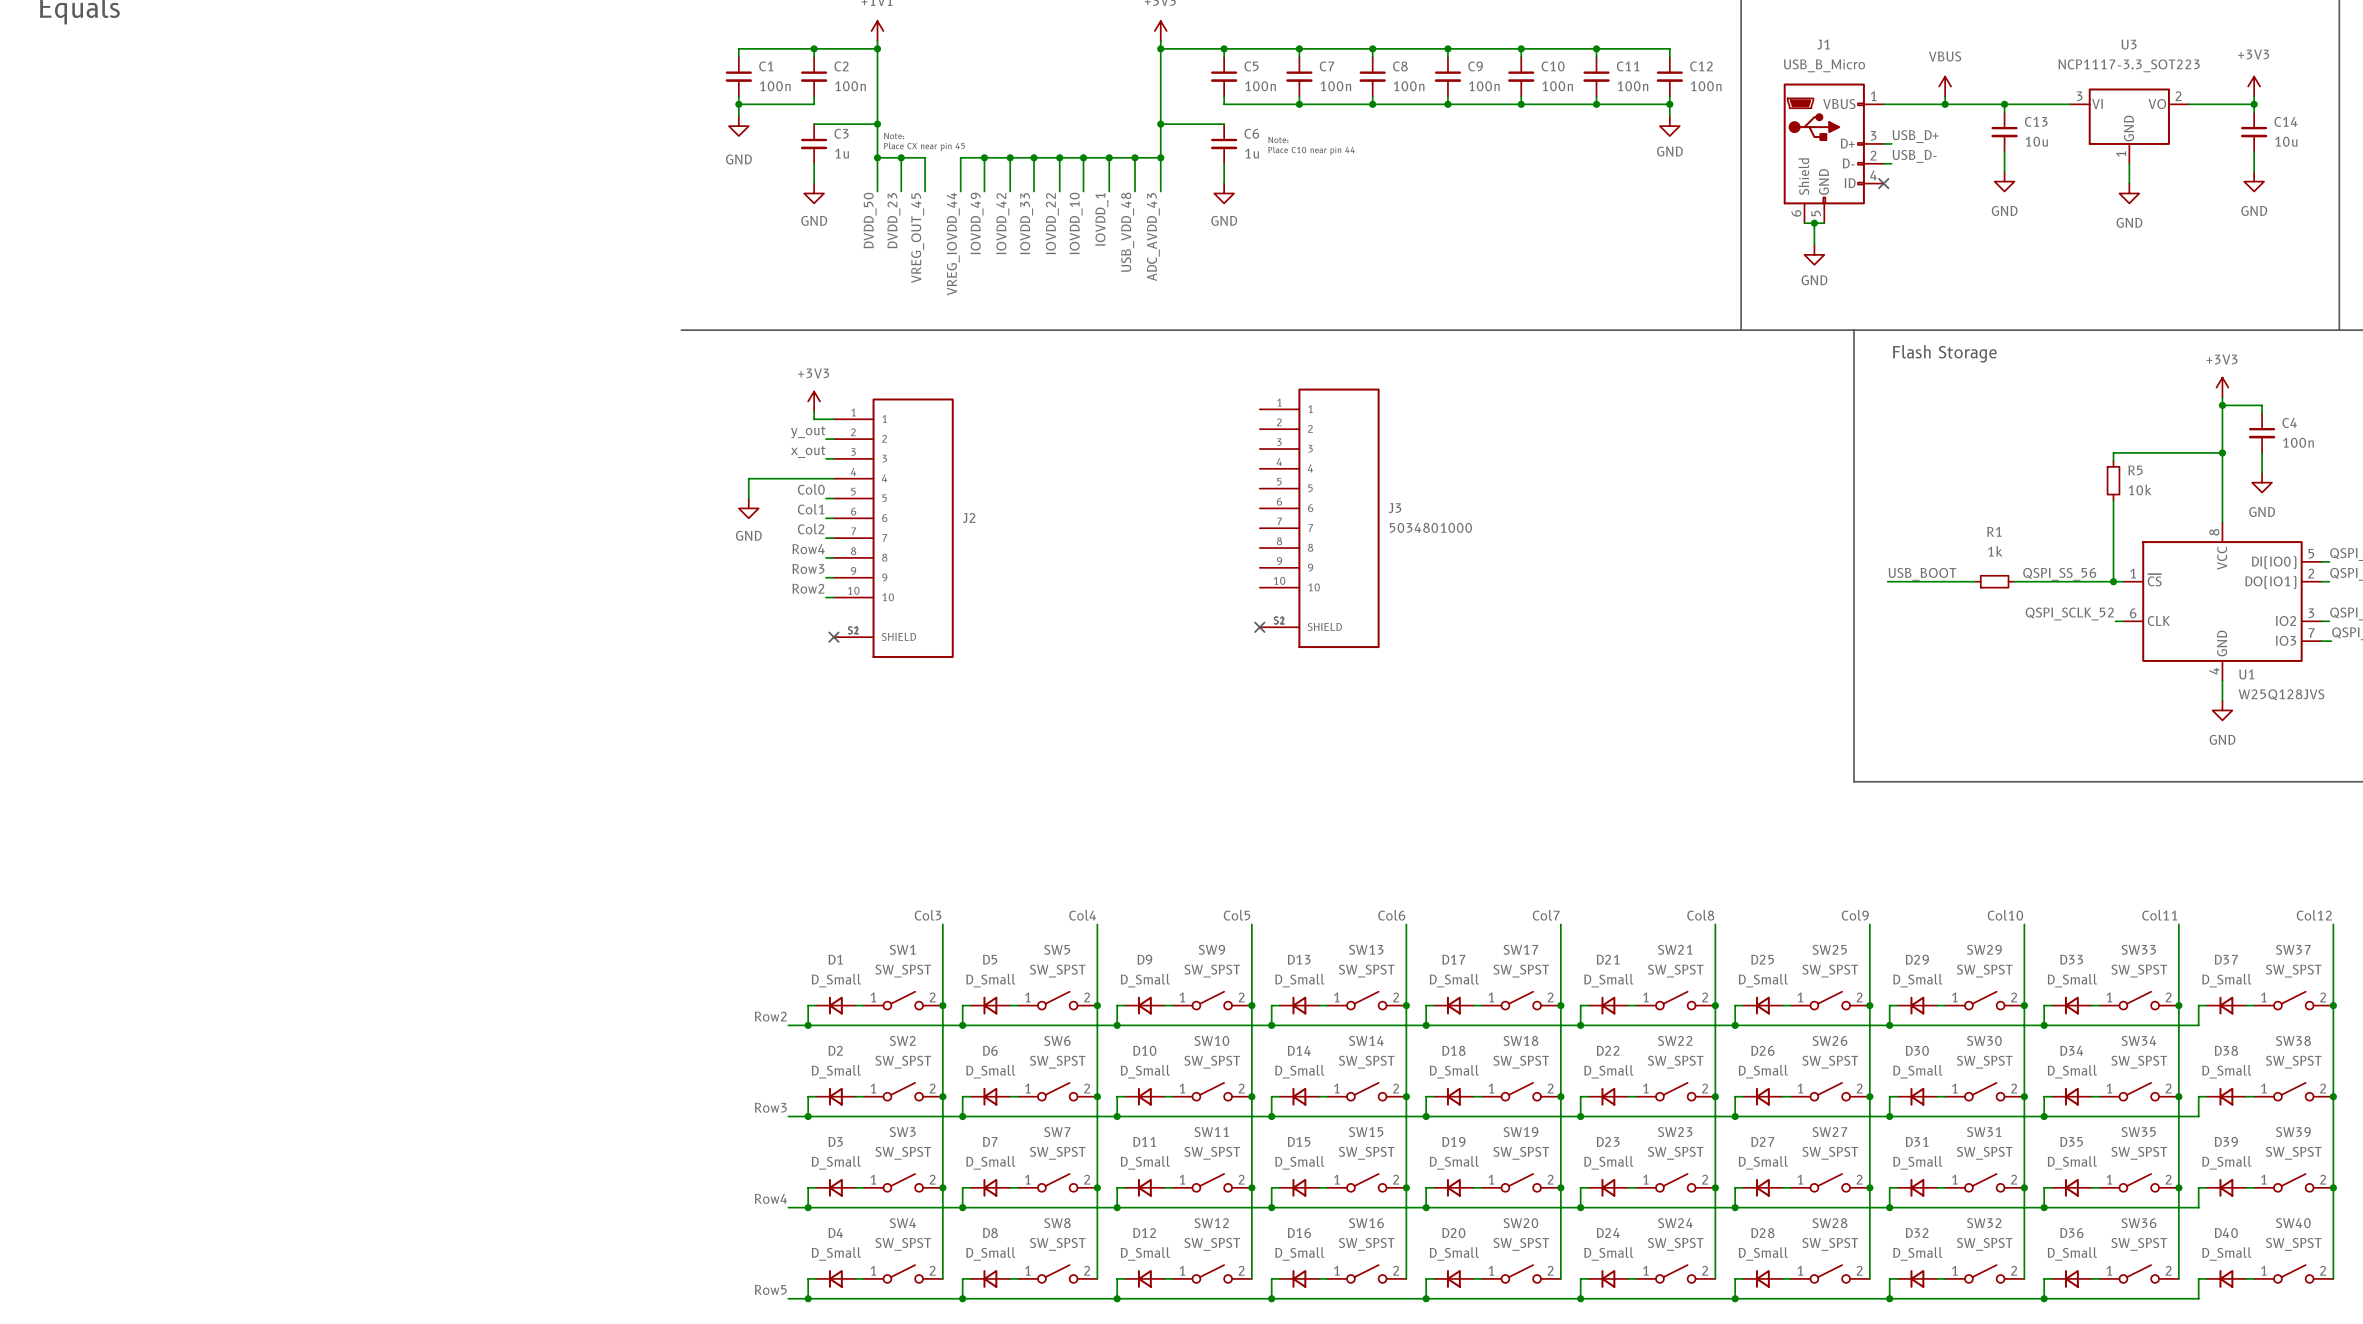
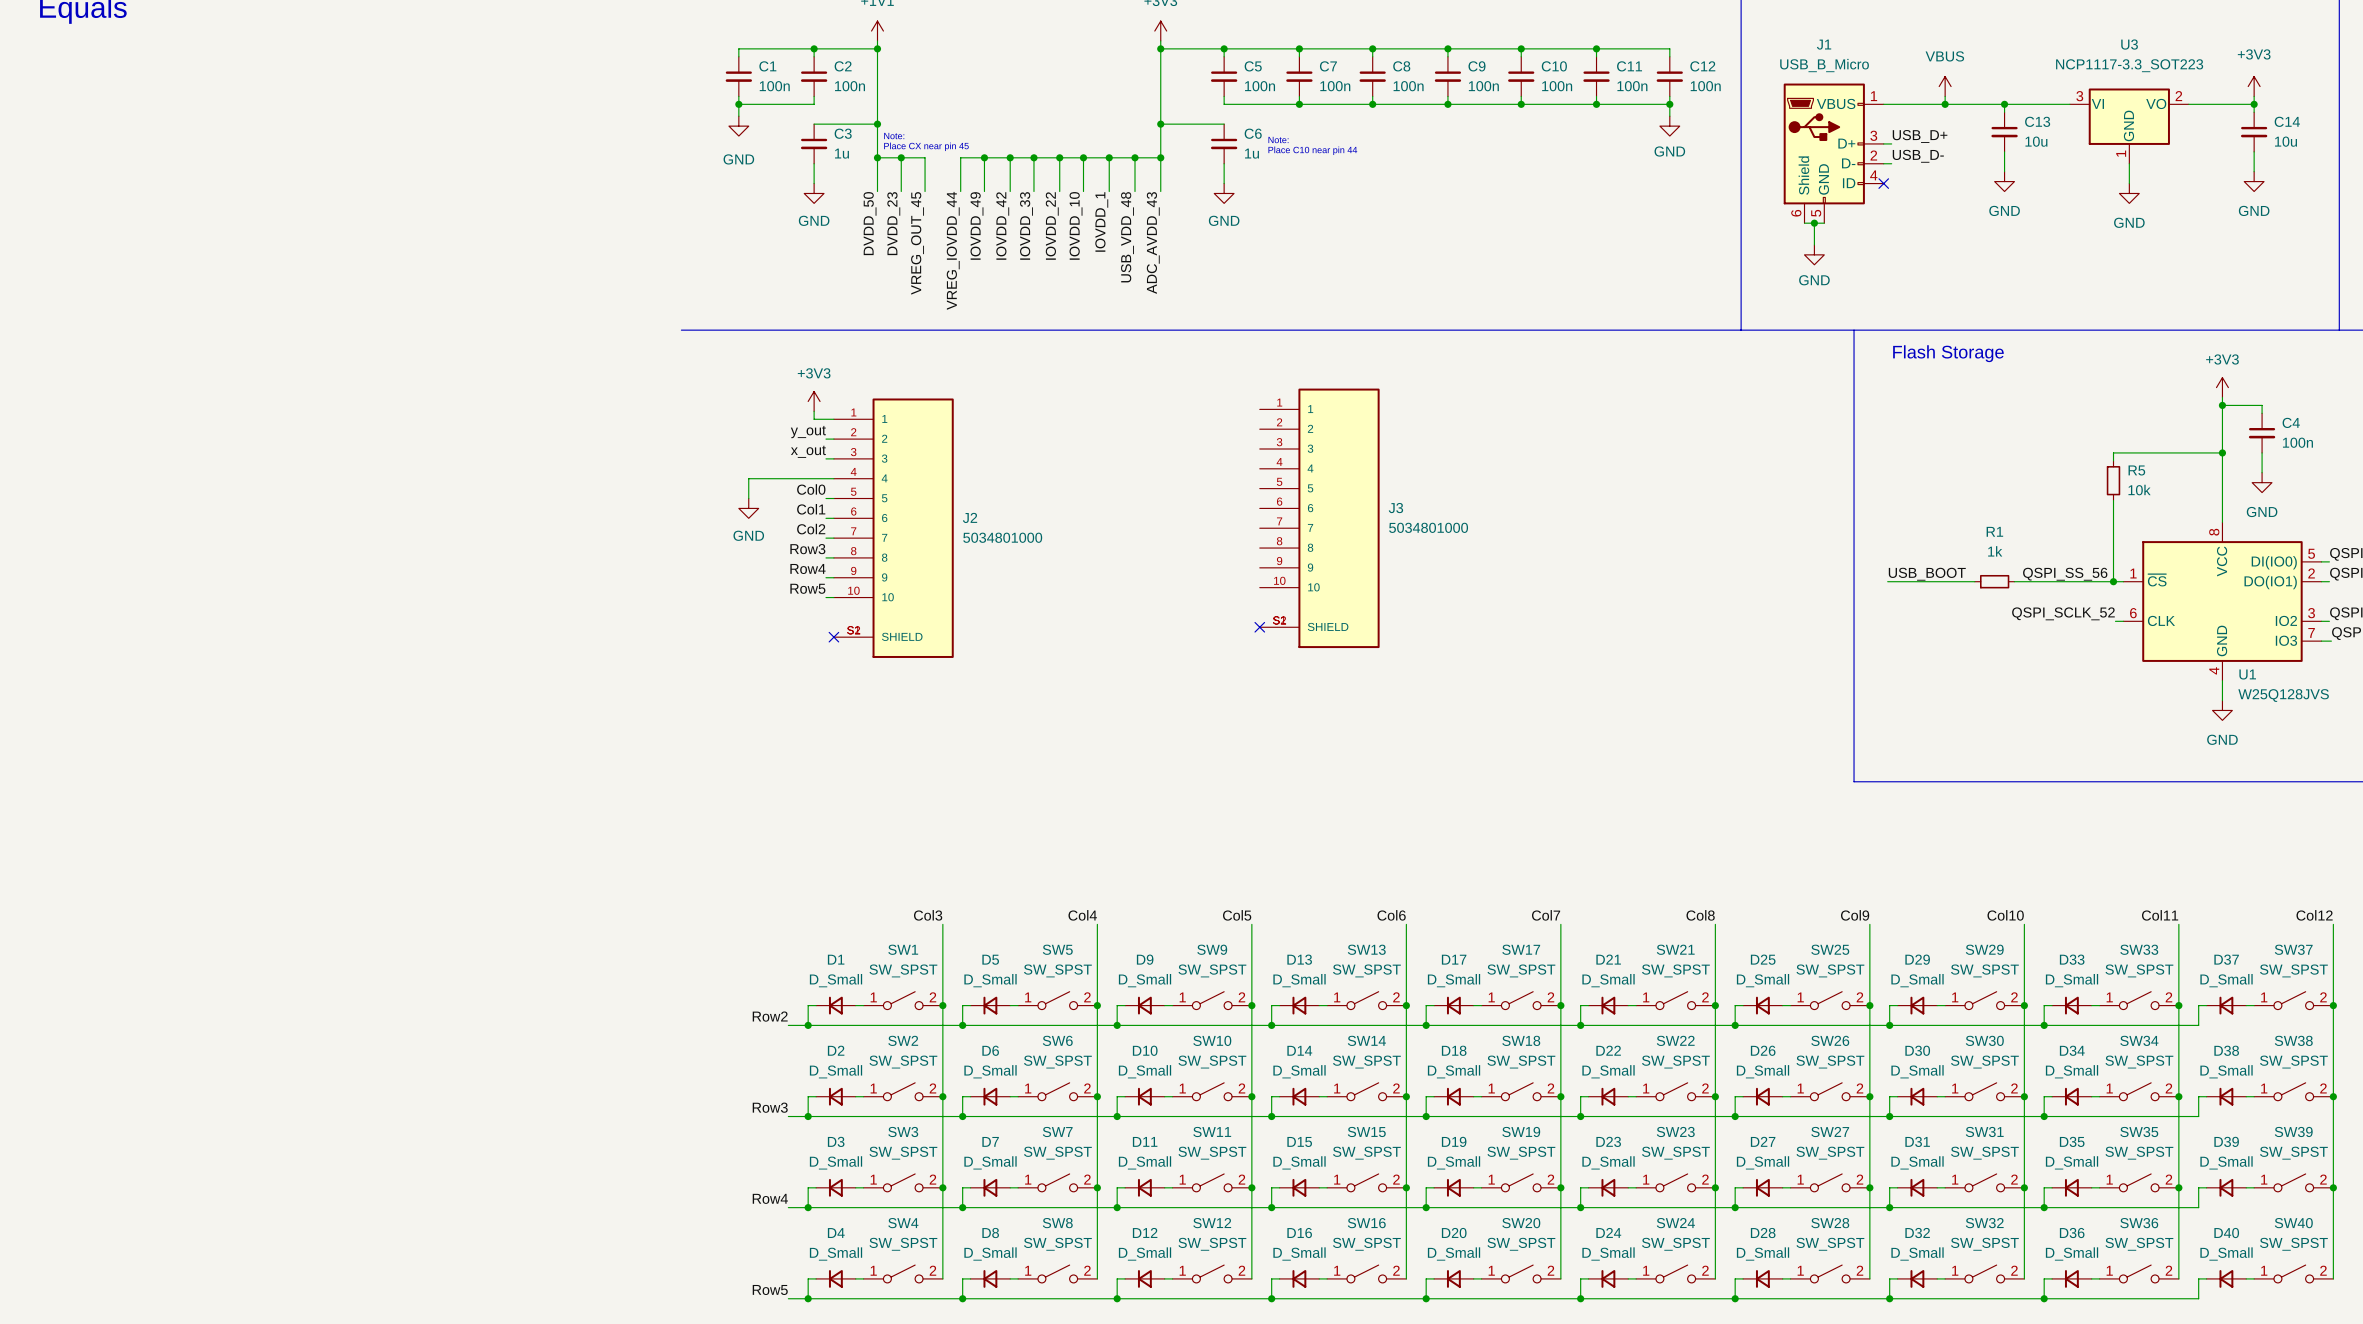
J2 value: none -> 5034801000 (1002, 537)
label: Row4 (808, 549) -> Row3 (807, 549)
label: Row3 (808, 568) -> Row4 (807, 568)
label: Row2 (808, 588) -> Row5 (807, 588)

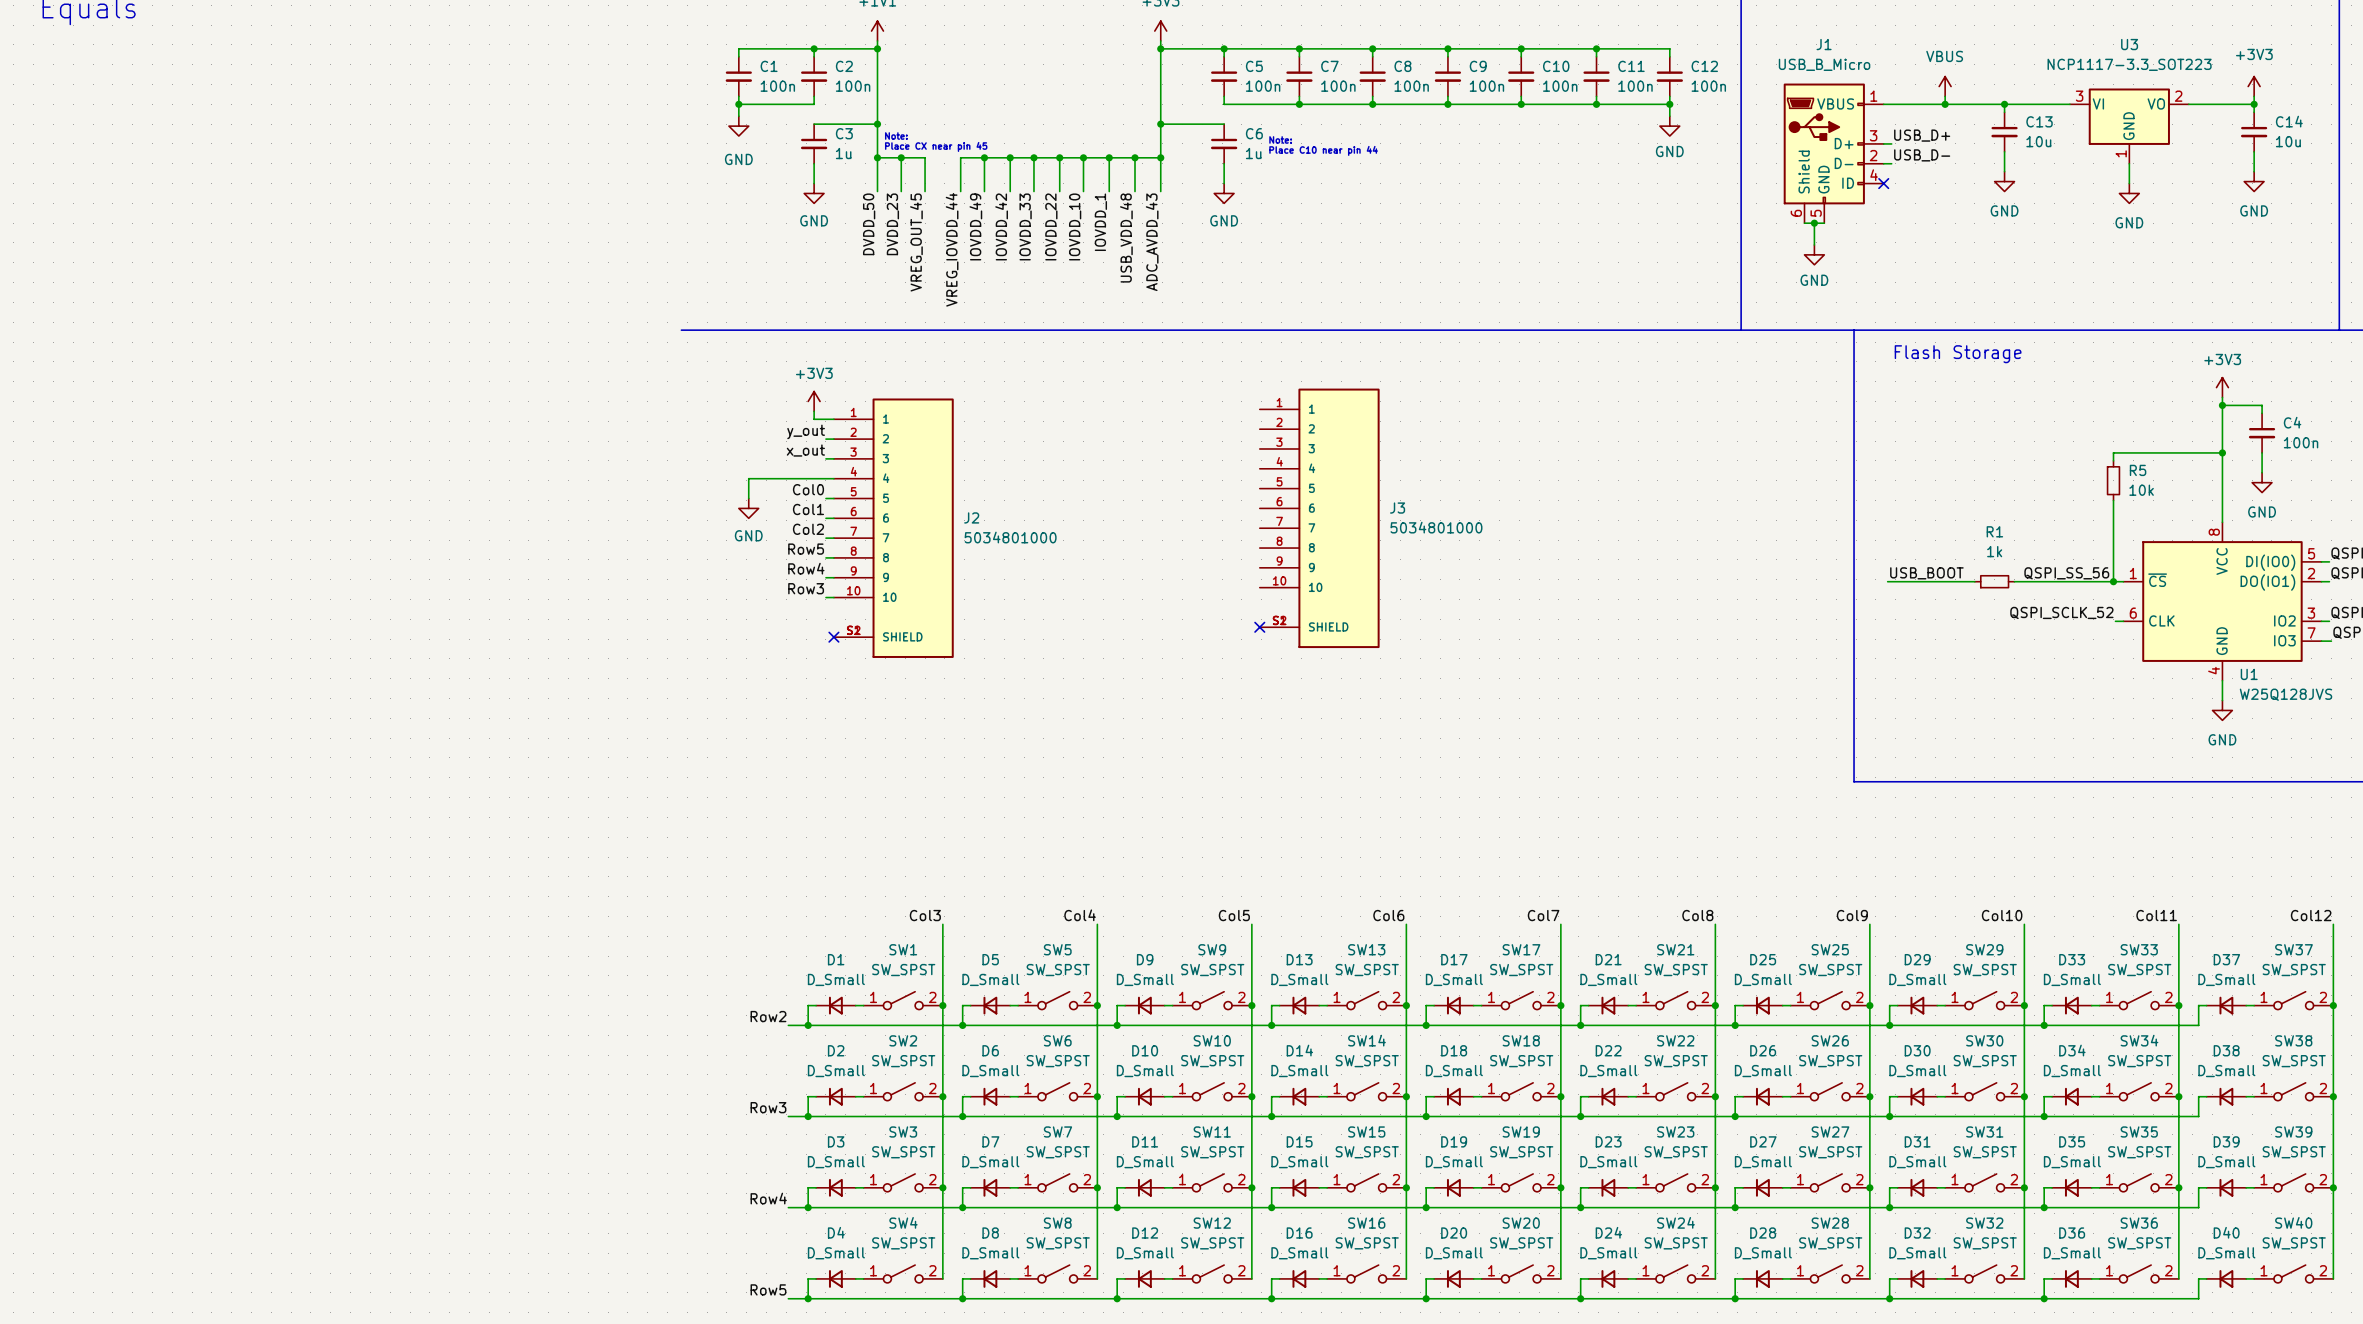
label: Row3 (807, 549) -> Row5 (806, 549)
label: Row5 (807, 588) -> Row3 (806, 588)

